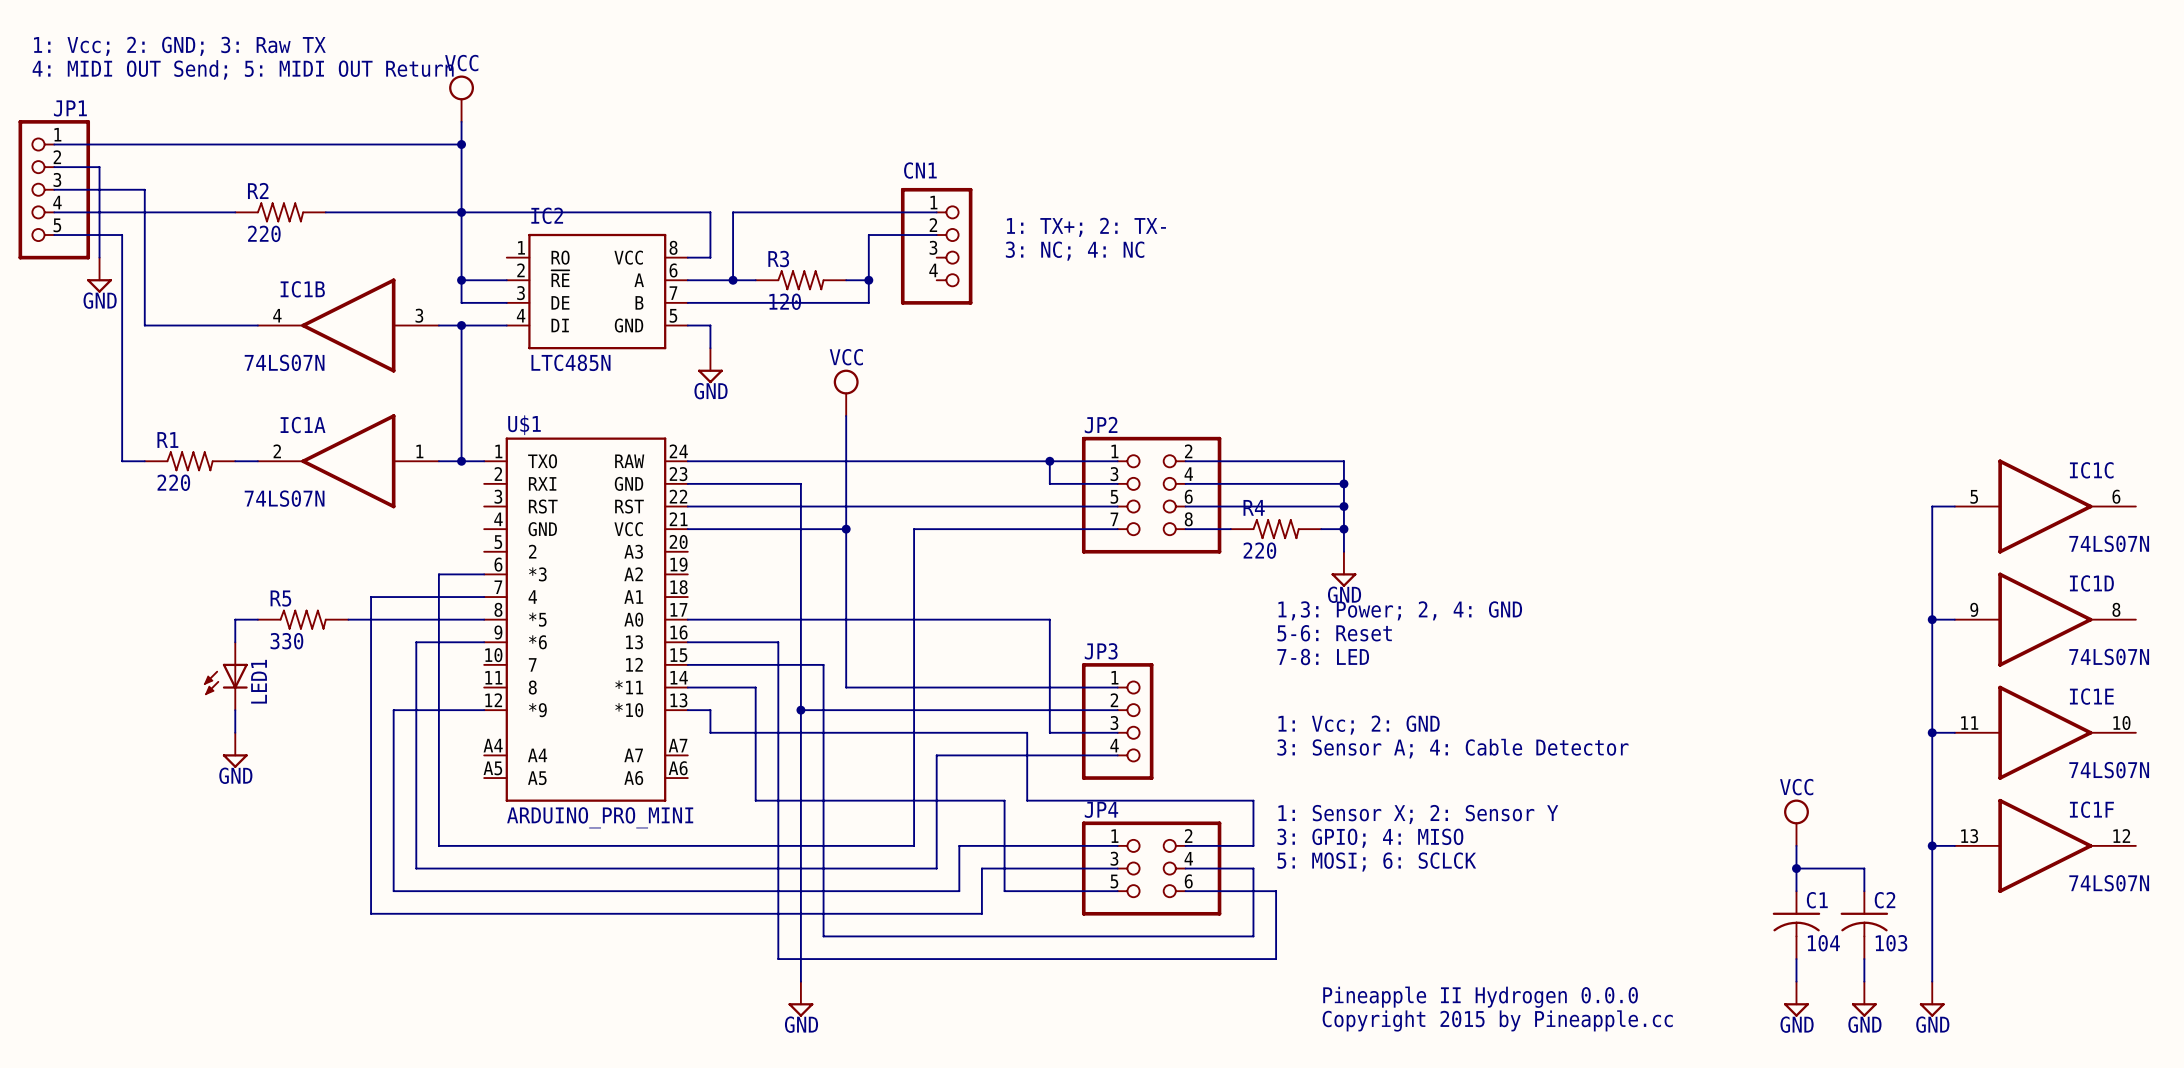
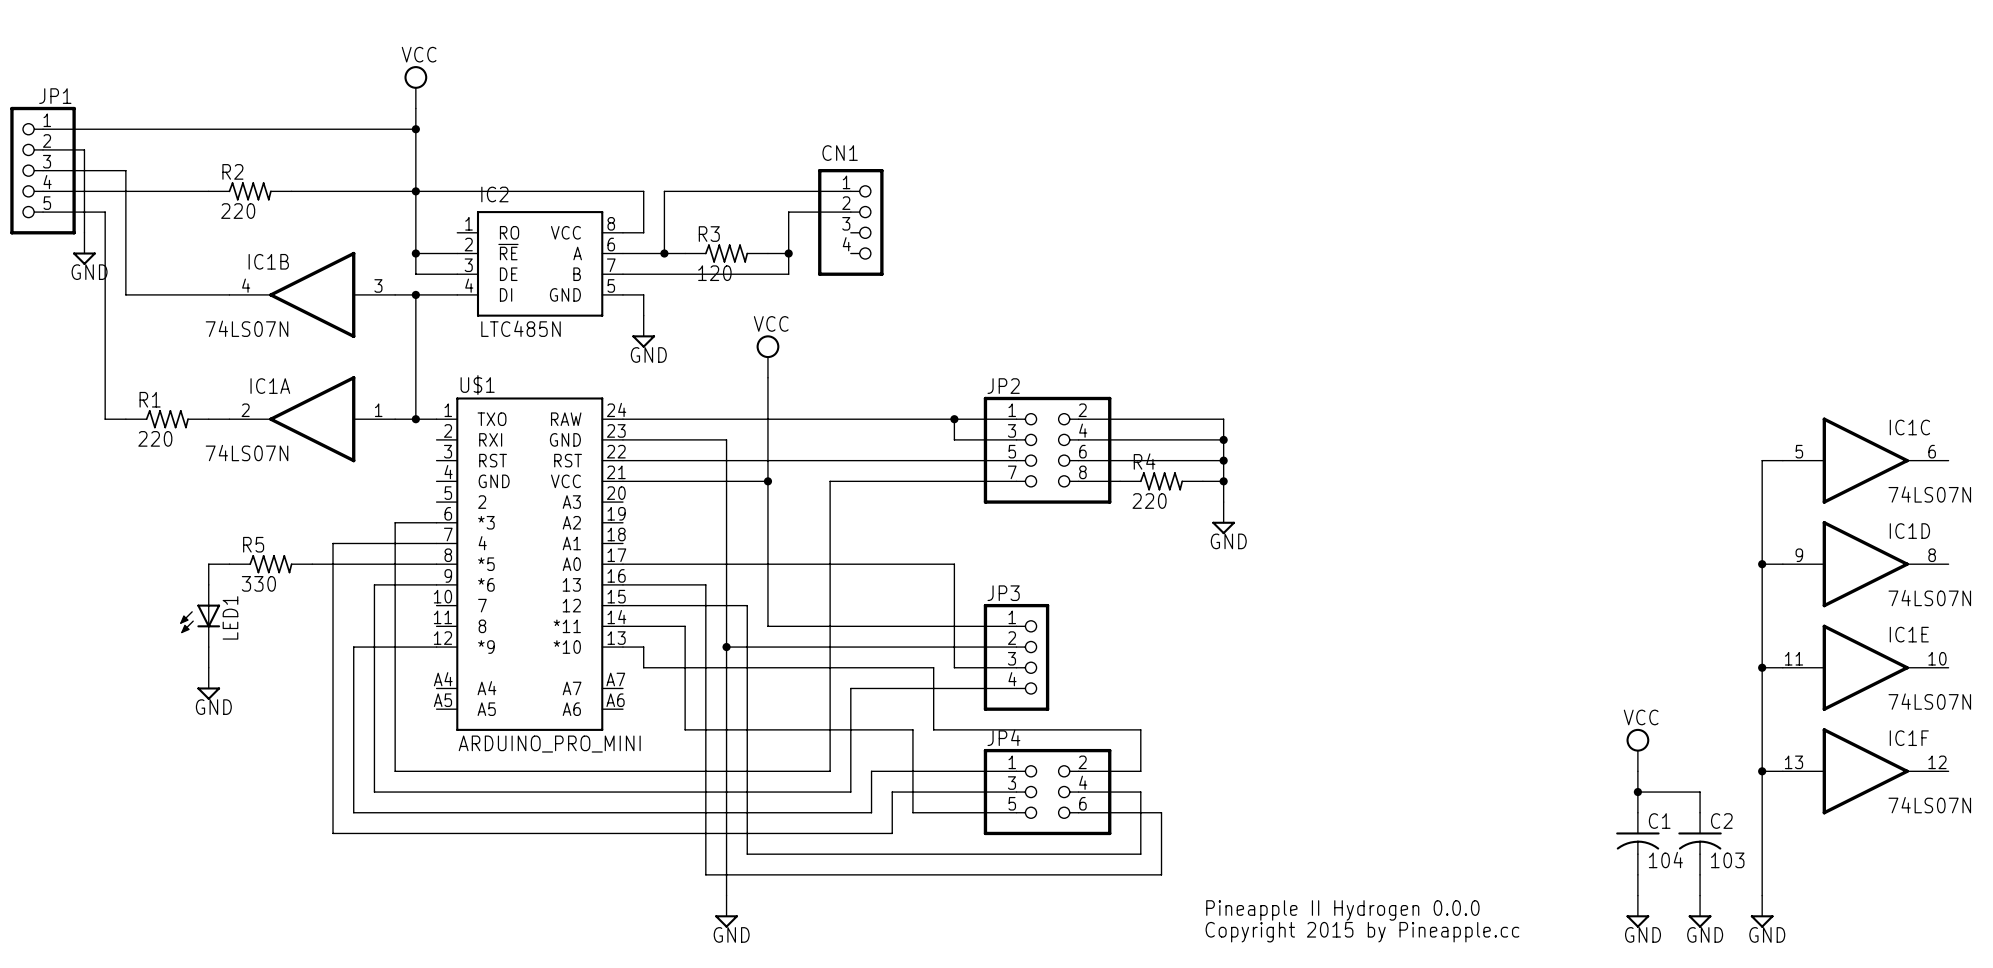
text: 1: Vcc; 2: GND; 3: Raw TX (179, 46) -> none
text: 4: MIDI OUT Send; 5: MIDI OUT Return (243, 69) -> none
text: 1: TX+; 2: TX- (1086, 227) -> none
text: 3: NC; 4: NC (1075, 251) -> none
text: 1,3: Power; 2, 4: GND (1400, 610) -> none
text: 5-6: Reset (1334, 633) -> none
text: 7-8: LED (1323, 656) -> none
text: 1: Vcc; 2: GND (1359, 725) -> none
text: 3: Sensor A; 4: Cable Detector (1452, 748) -> none
text: 1: Sensor X; 2: Sensor Y (1418, 814) -> none
text: 3: GPIO; 4: MISO (1370, 838) -> none
text: 5: MOSI; 6: SCLCK (1376, 862) -> none

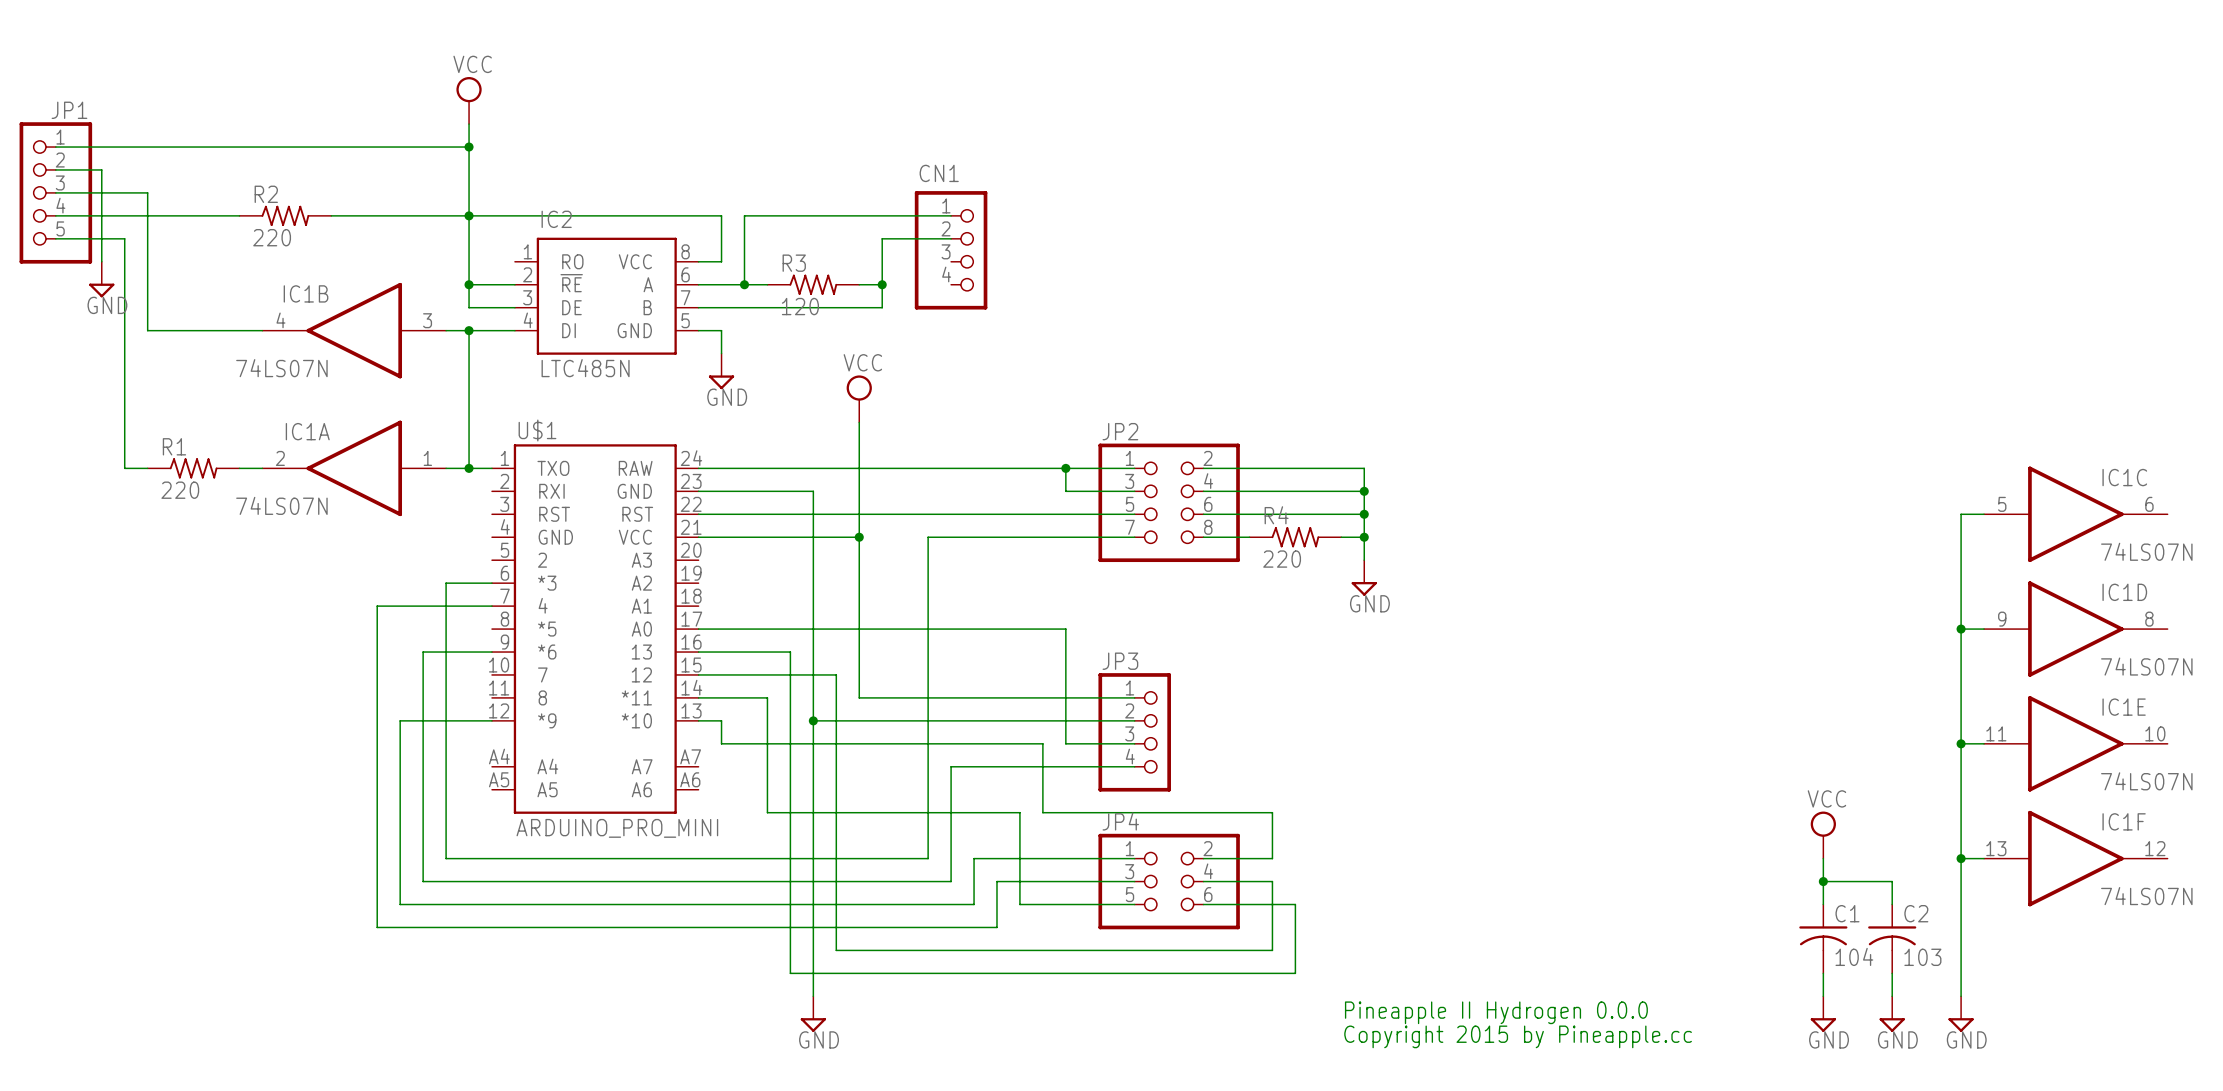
wire: (229, 564) (208, 564) (208, 584) -> none
R5: 330 (270, 564) -> none
wire: (312, 564) (436, 564) -> none
LED1: (200, 615) -> none
wire: (208, 647) (208, 667) -> none
power symbol: GND (208, 683) -> none

